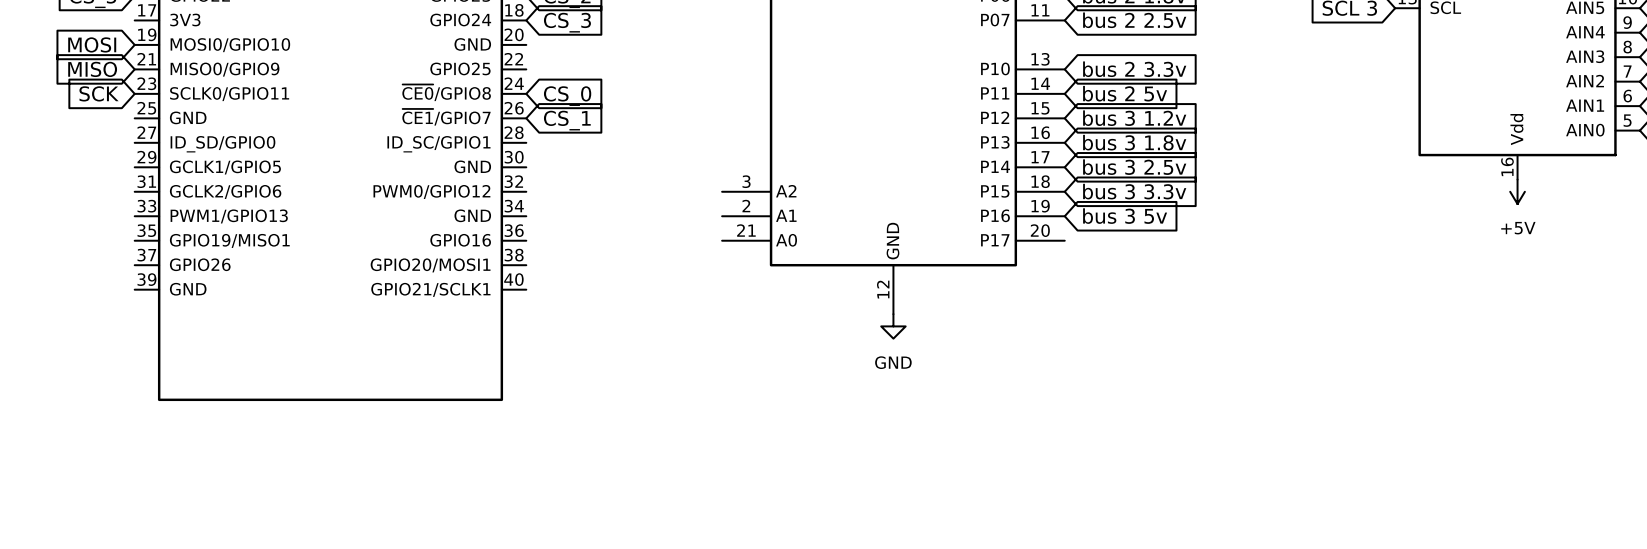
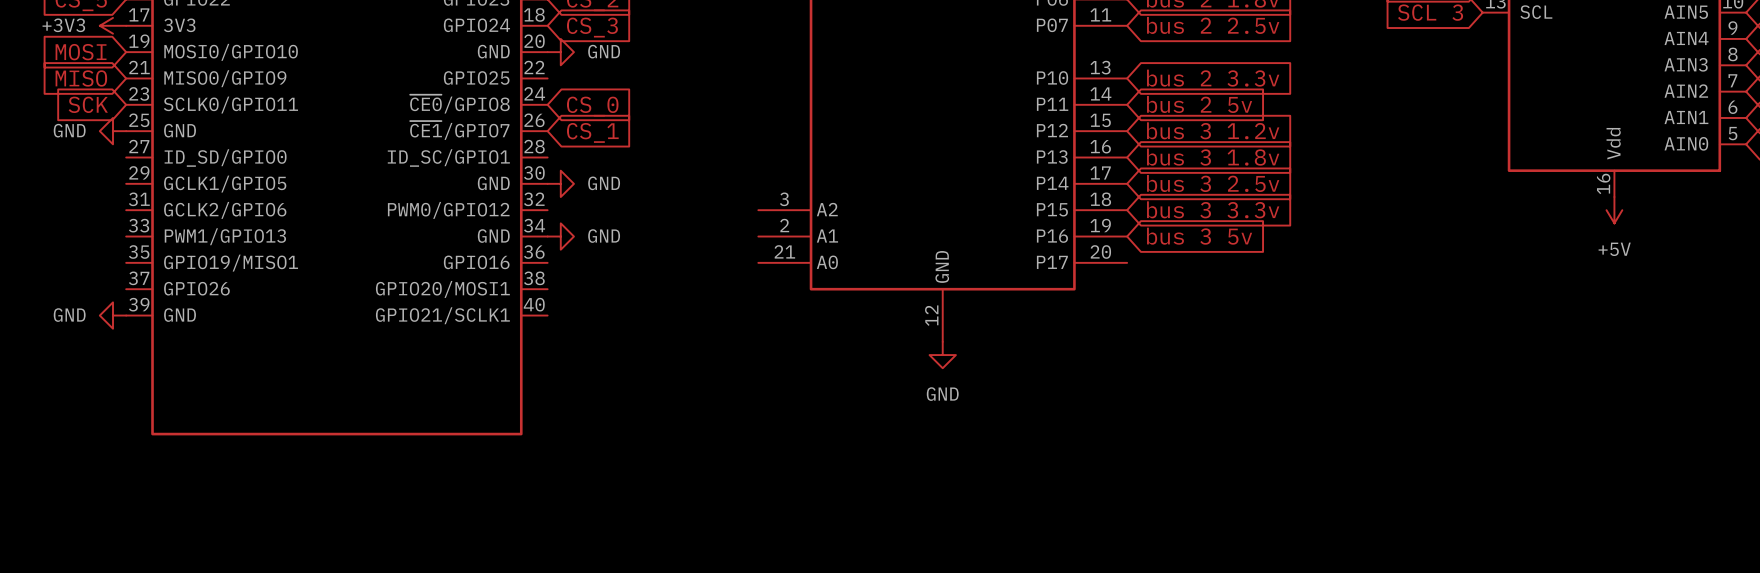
power symbol: none -> +3V3 (113, 25)
power symbol: none -> GND (560, 52)
power symbol: none -> GND (113, 131)
power symbol: none -> GND (560, 183)
power symbol: none -> GND (560, 236)
power symbol: none -> GND (113, 315)

